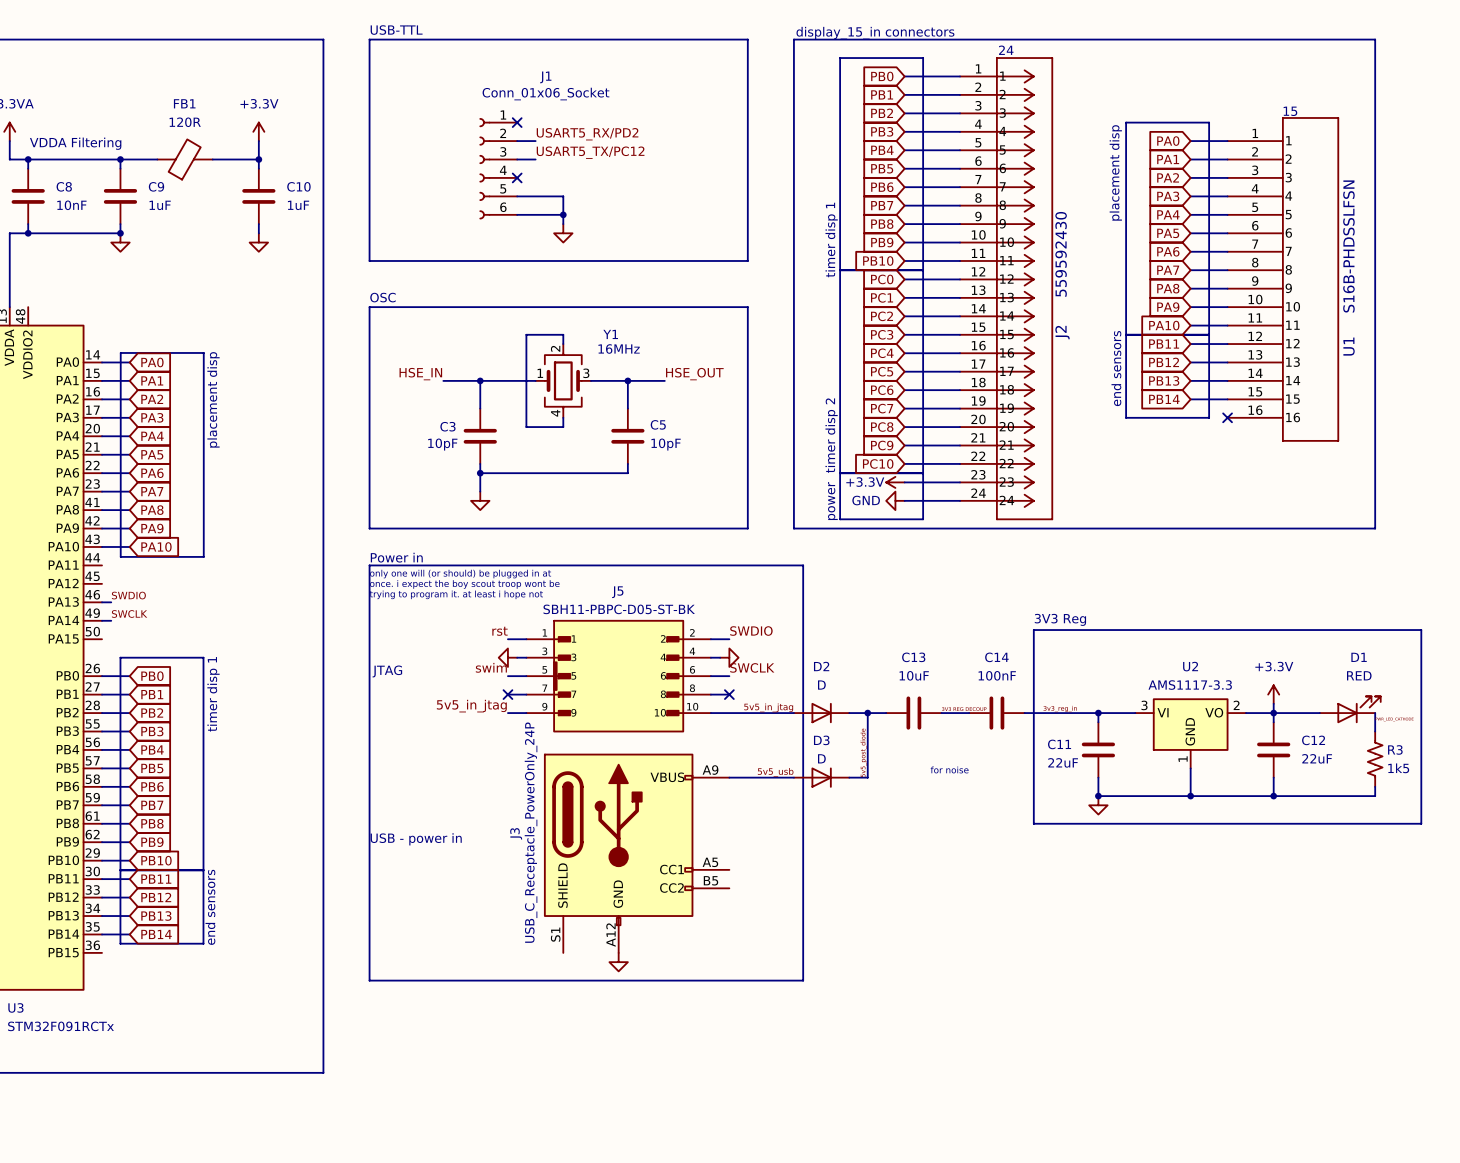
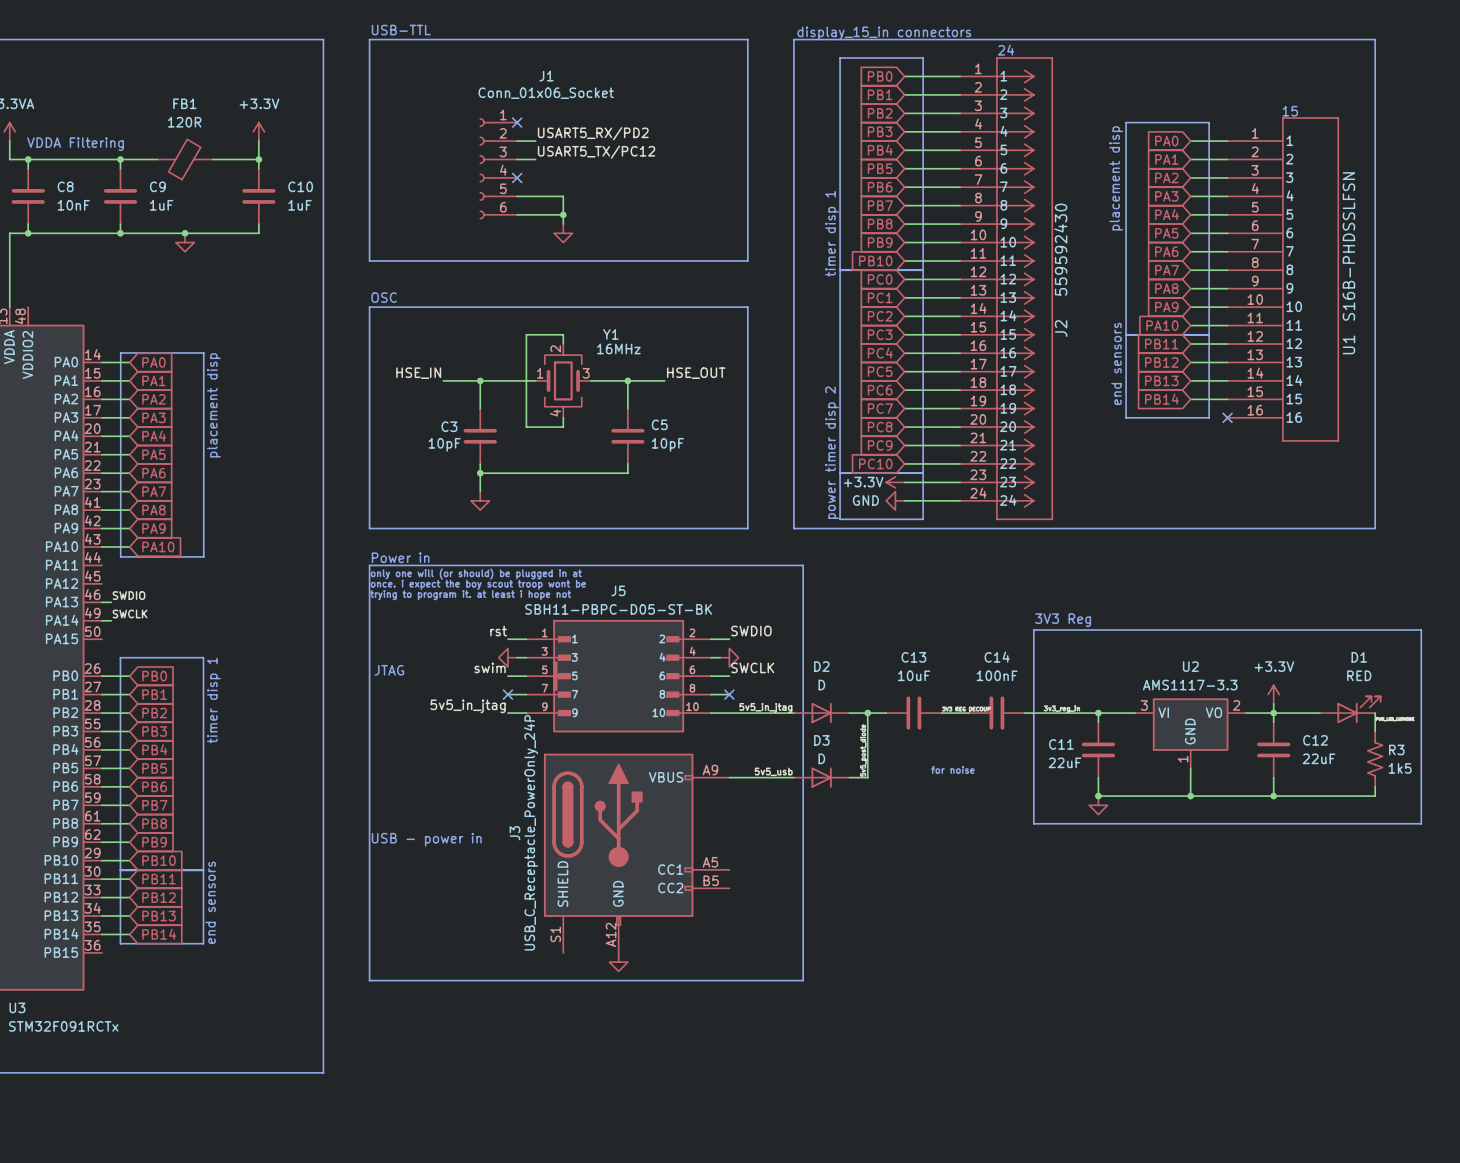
wire: none -> (120, 233) (258, 233)
junction: none -> (185, 233)
power symbol: (120, 242) -> none
power symbol: none -> (185, 242)
power symbol: (258, 242) -> none

